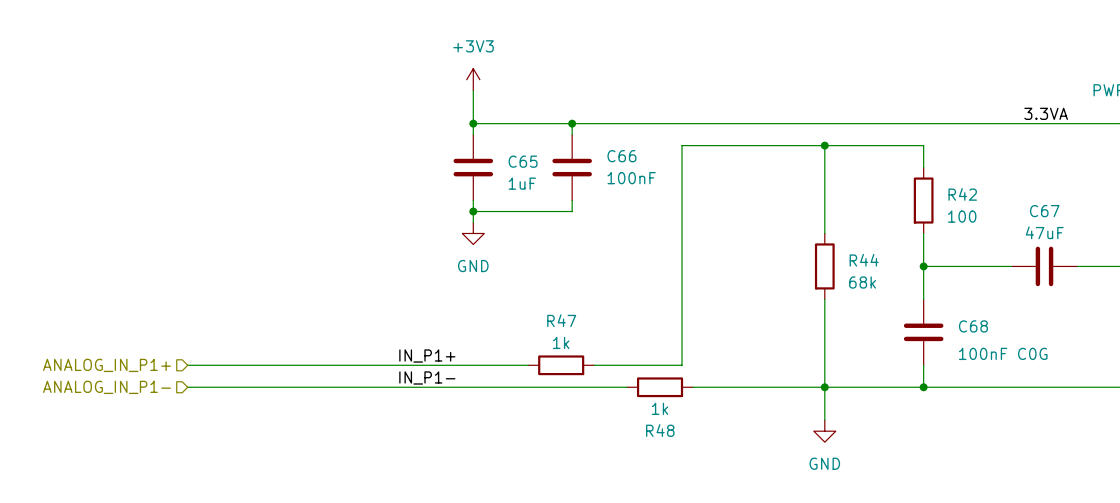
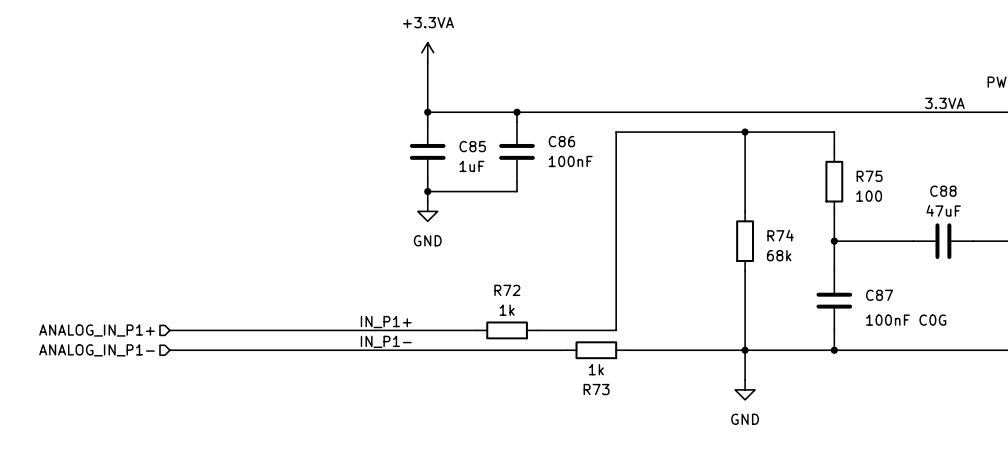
power symbol: none -> +3.3VA (427, 52)
power symbol: +3V3 (473, 79) -> none
C66 name: C66 (621, 156) -> C86 (561, 141)
C65 name: C65 (523, 161) -> C85 (472, 146)
R42 name: R42 (962, 194) -> R75 (869, 176)
C67 name: C67 (1044, 211) -> C88 (943, 191)
R44 name: R44 (864, 260) -> R74 (780, 235)
R47 name: R47 (561, 320) -> R72 (507, 290)
C68 name: C68 (973, 326) -> C87 (879, 295)
R48 name: R48 (660, 430) -> R73 (596, 389)

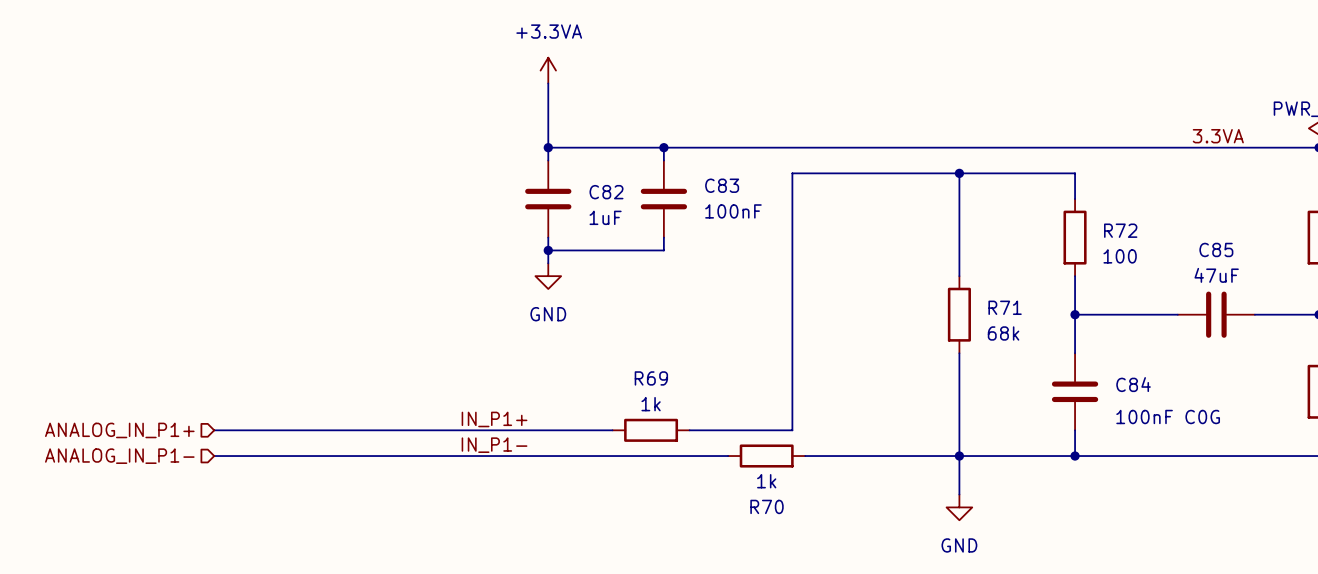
C86 name: C86 (561, 141) -> C83 (722, 185)
C85 name: C85 (472, 146) -> C82 (606, 192)
R75 name: R75 (869, 176) -> R72 (1120, 230)
C88 name: C88 (943, 191) -> C85 (1216, 249)
R74 name: R74 (780, 235) -> R71 (1005, 307)
R72 name: R72 (507, 290) -> R69 (651, 378)
C87 name: C87 (879, 295) -> C84 (1133, 384)
R73 name: R73 (596, 389) -> R70 (767, 506)

